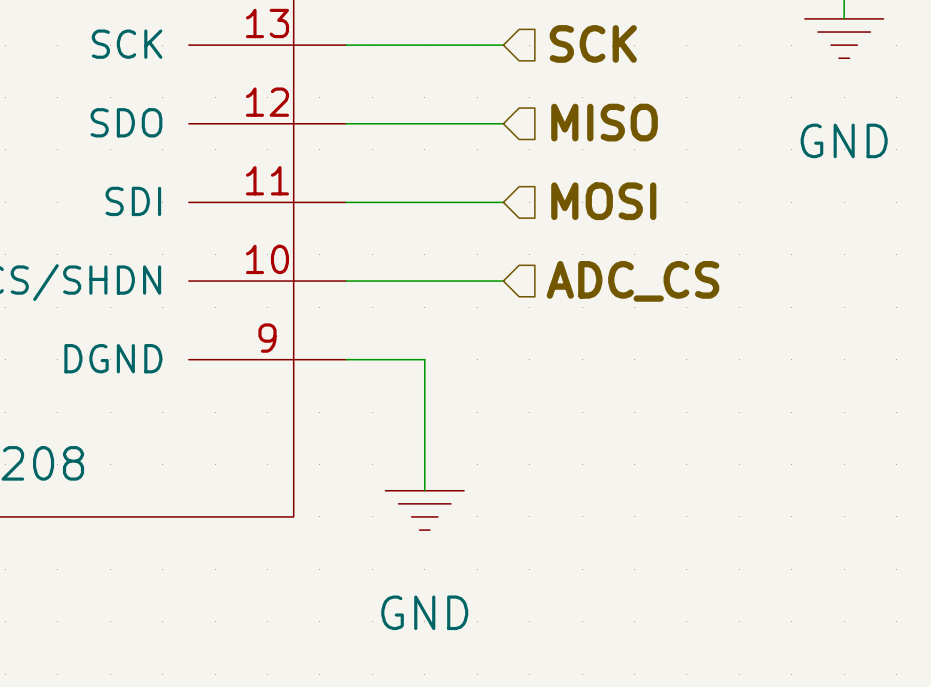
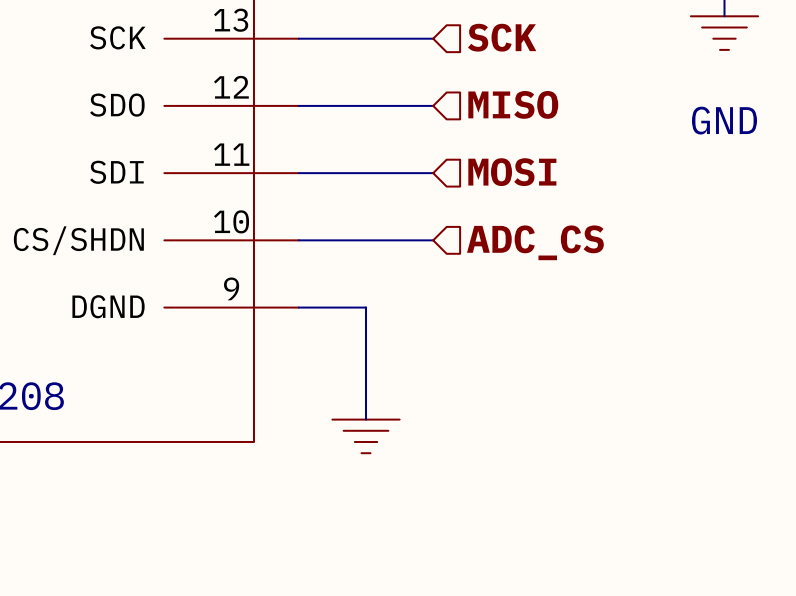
power symbol text: GND (424, 612) -> none

